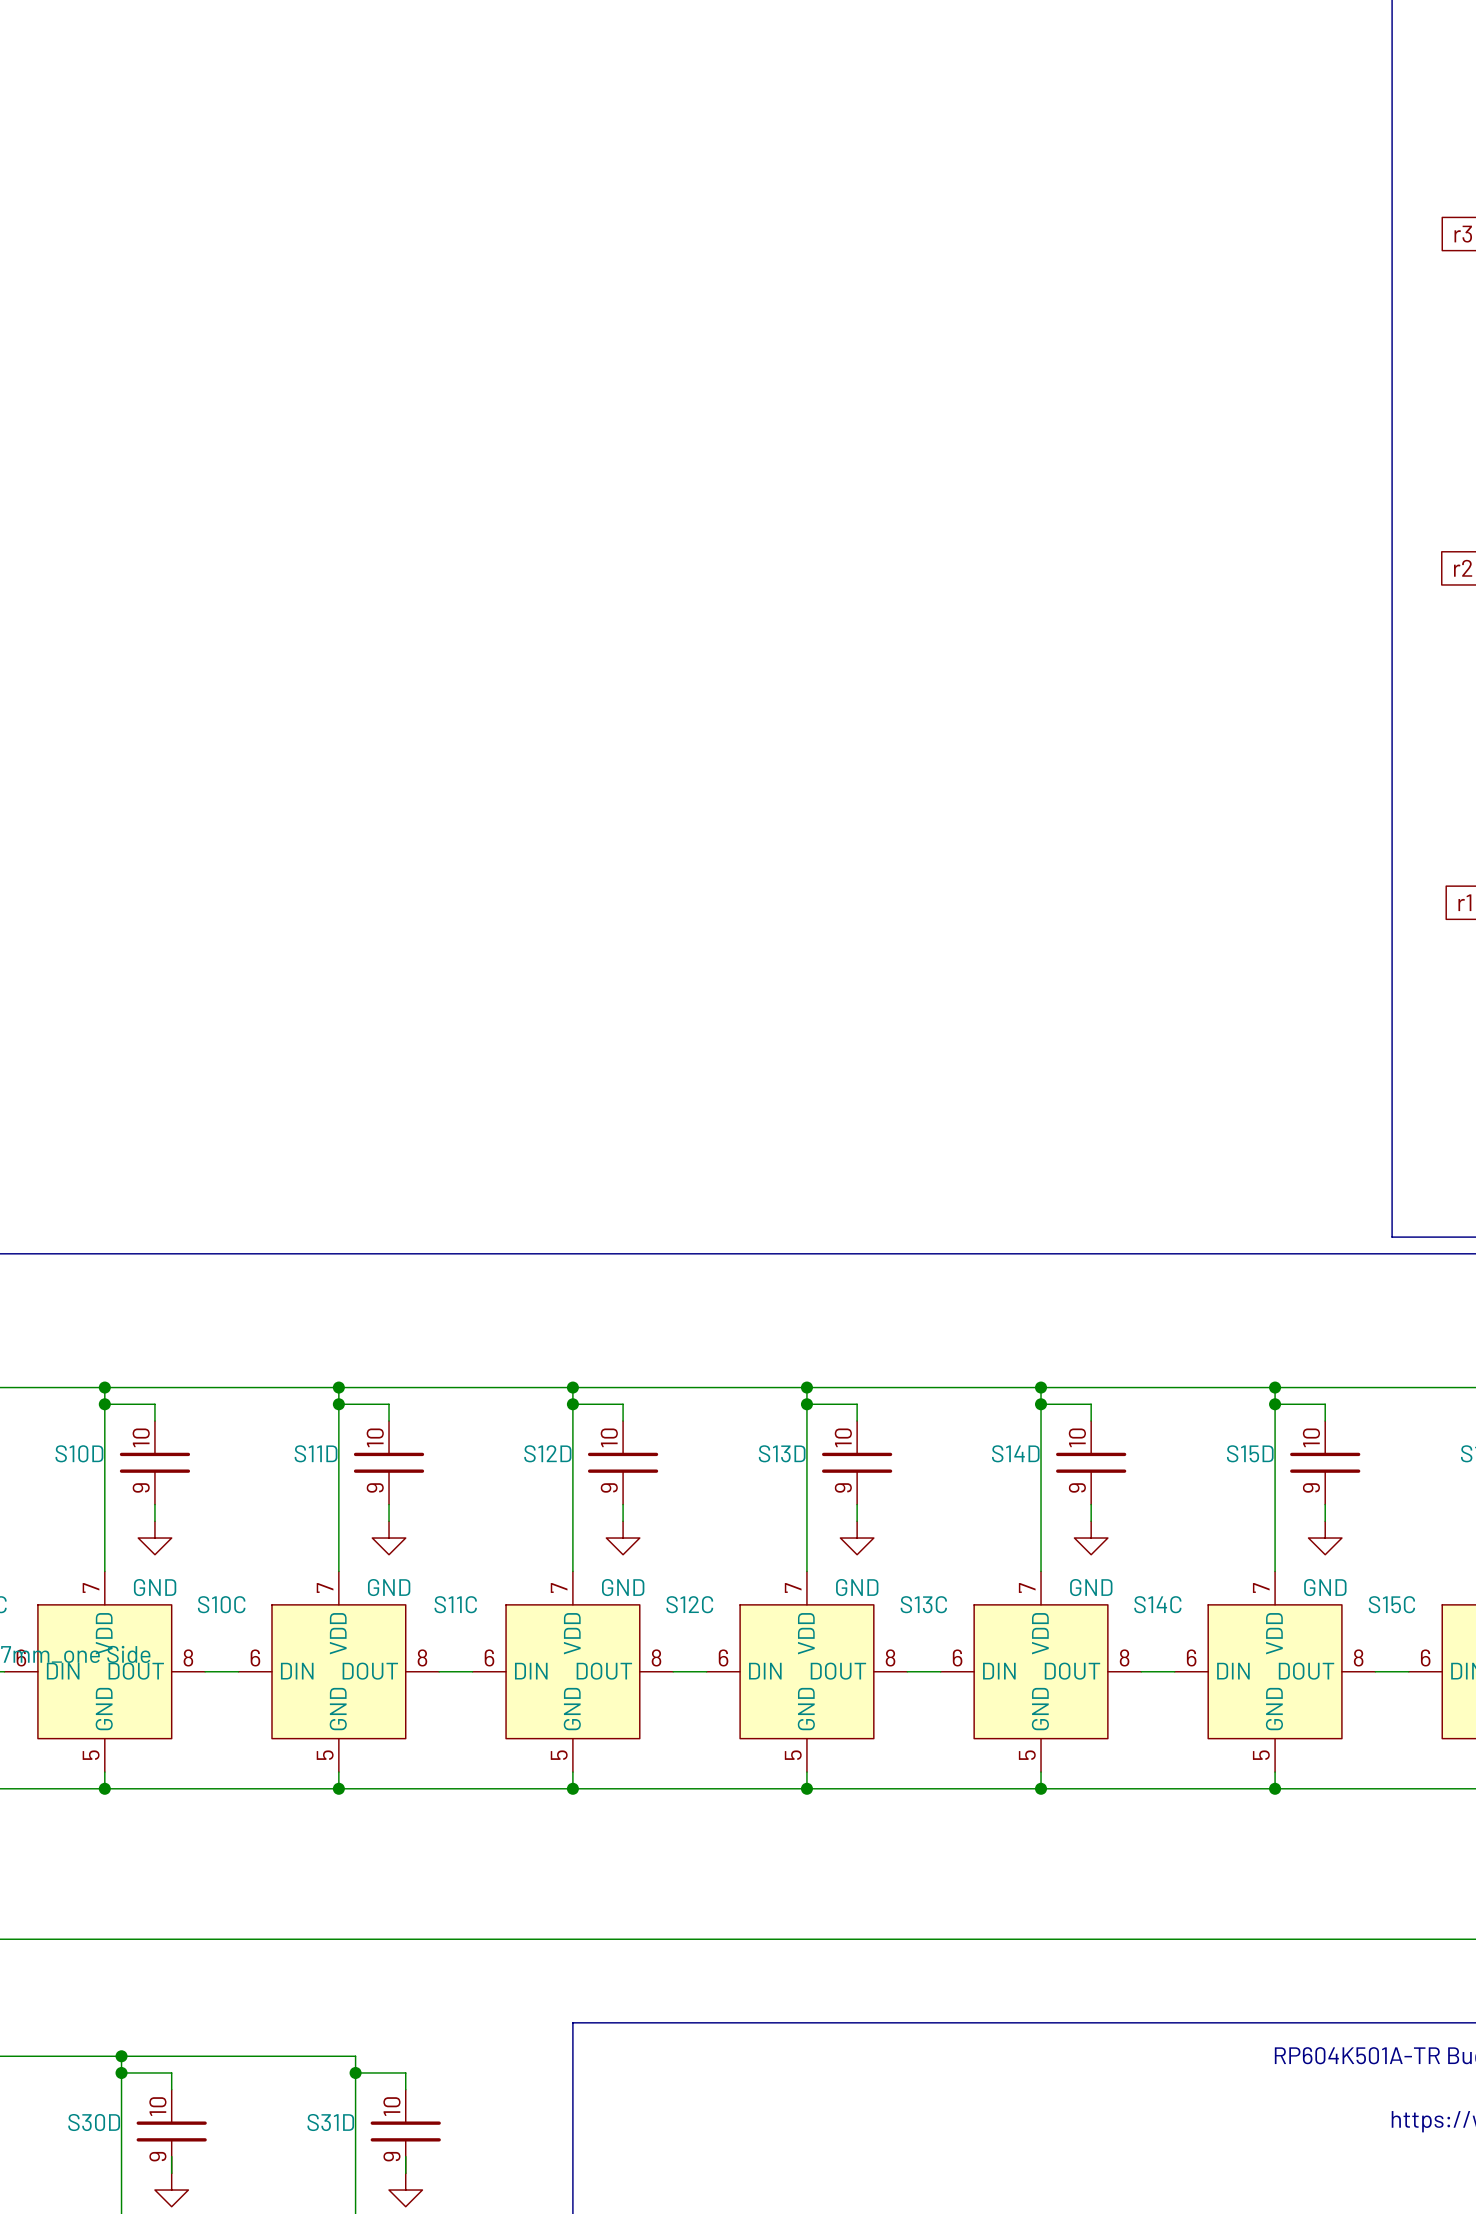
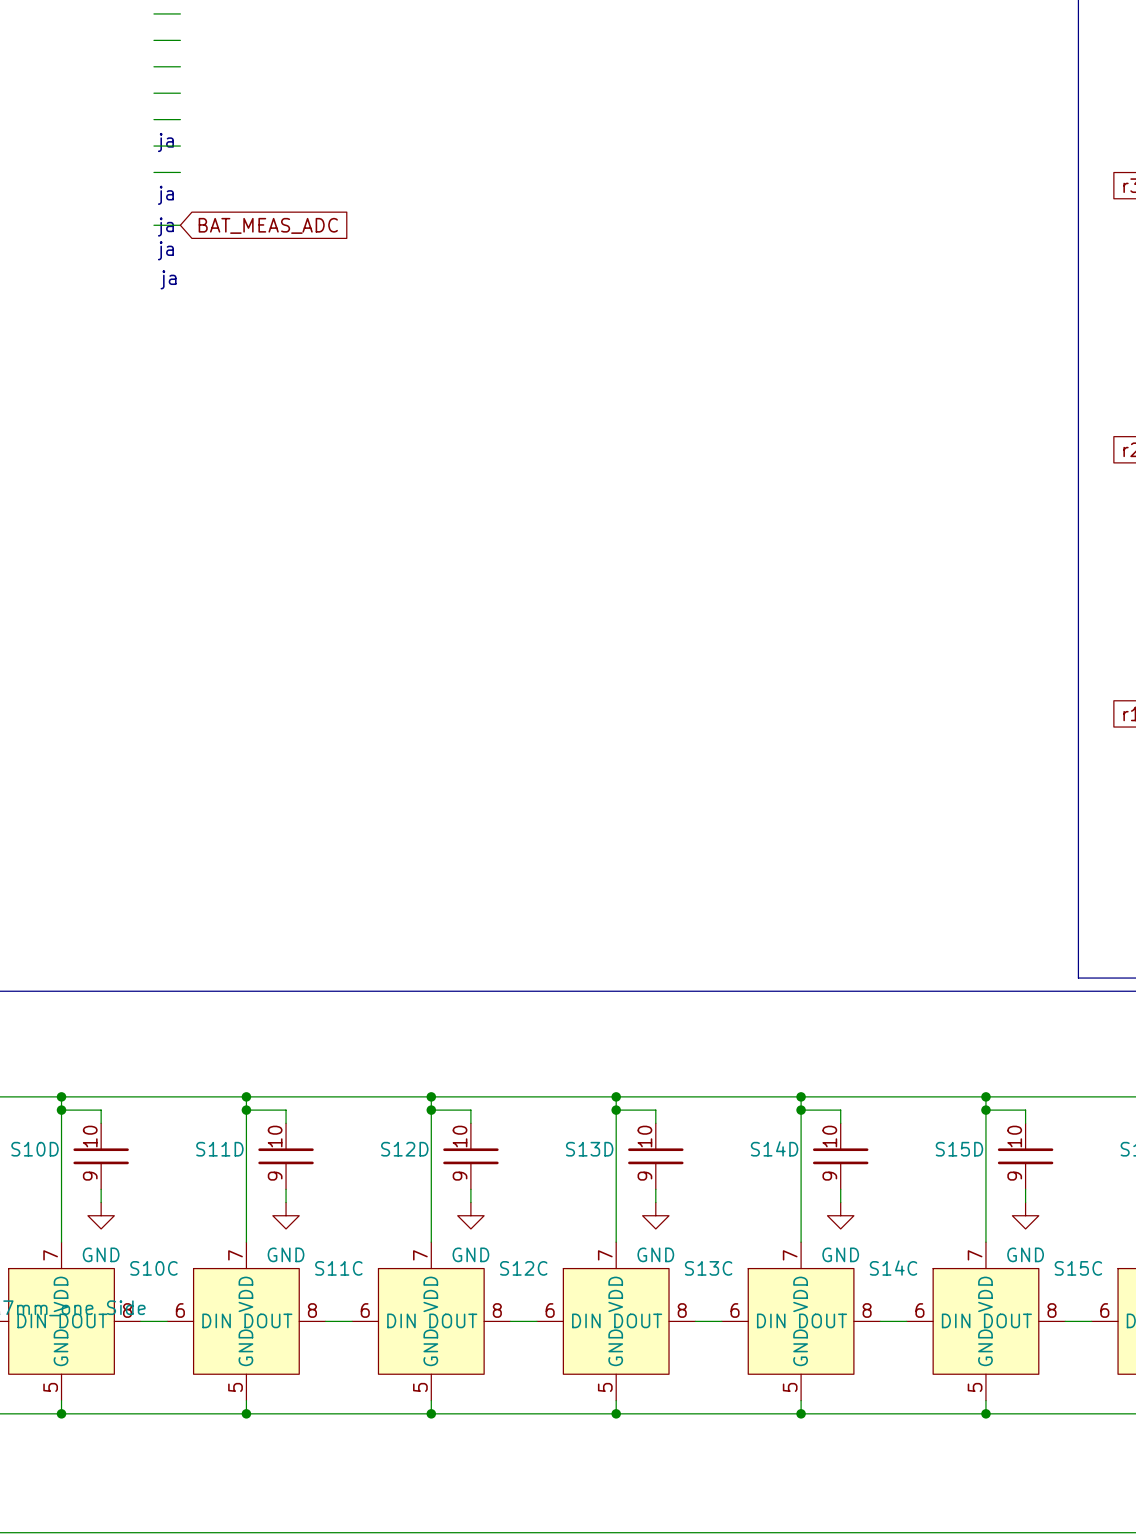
wire: none -> (153, 13) (180, 13)
wire: none -> (153, 40) (180, 40)
wire: none -> (153, 66) (180, 66)
wire: none -> (153, 93) (180, 93)
wire: none -> (153, 119) (180, 119)
text: none -> ja (165, 142)
wire: none -> (153, 146) (180, 146)
wire: none -> (153, 172) (180, 172)
text: none -> ja (165, 195)
wire: none -> (153, 225) (180, 225)
global label: none -> BAT_MEAS_ADC (268, 225)
text: none -> ja (165, 227)
text: none -> ja (165, 250)
text: none -> ja (168, 279)

